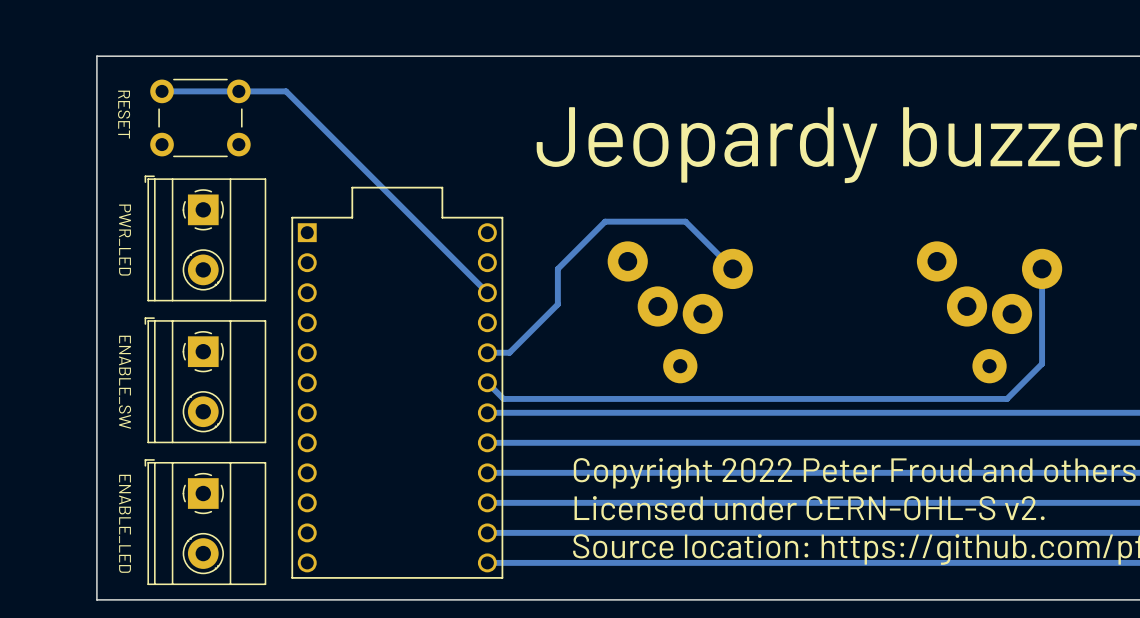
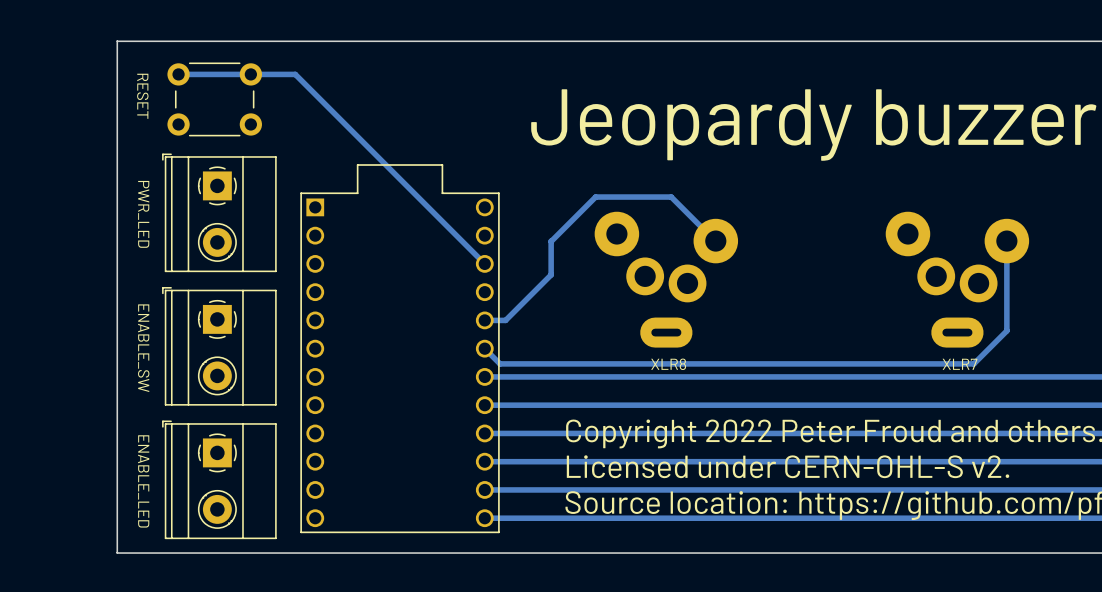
XLR8: none -> (666, 279)
XLR7: none -> (957, 279)
part: (680, 312) -> none
part: (989, 312) -> none

